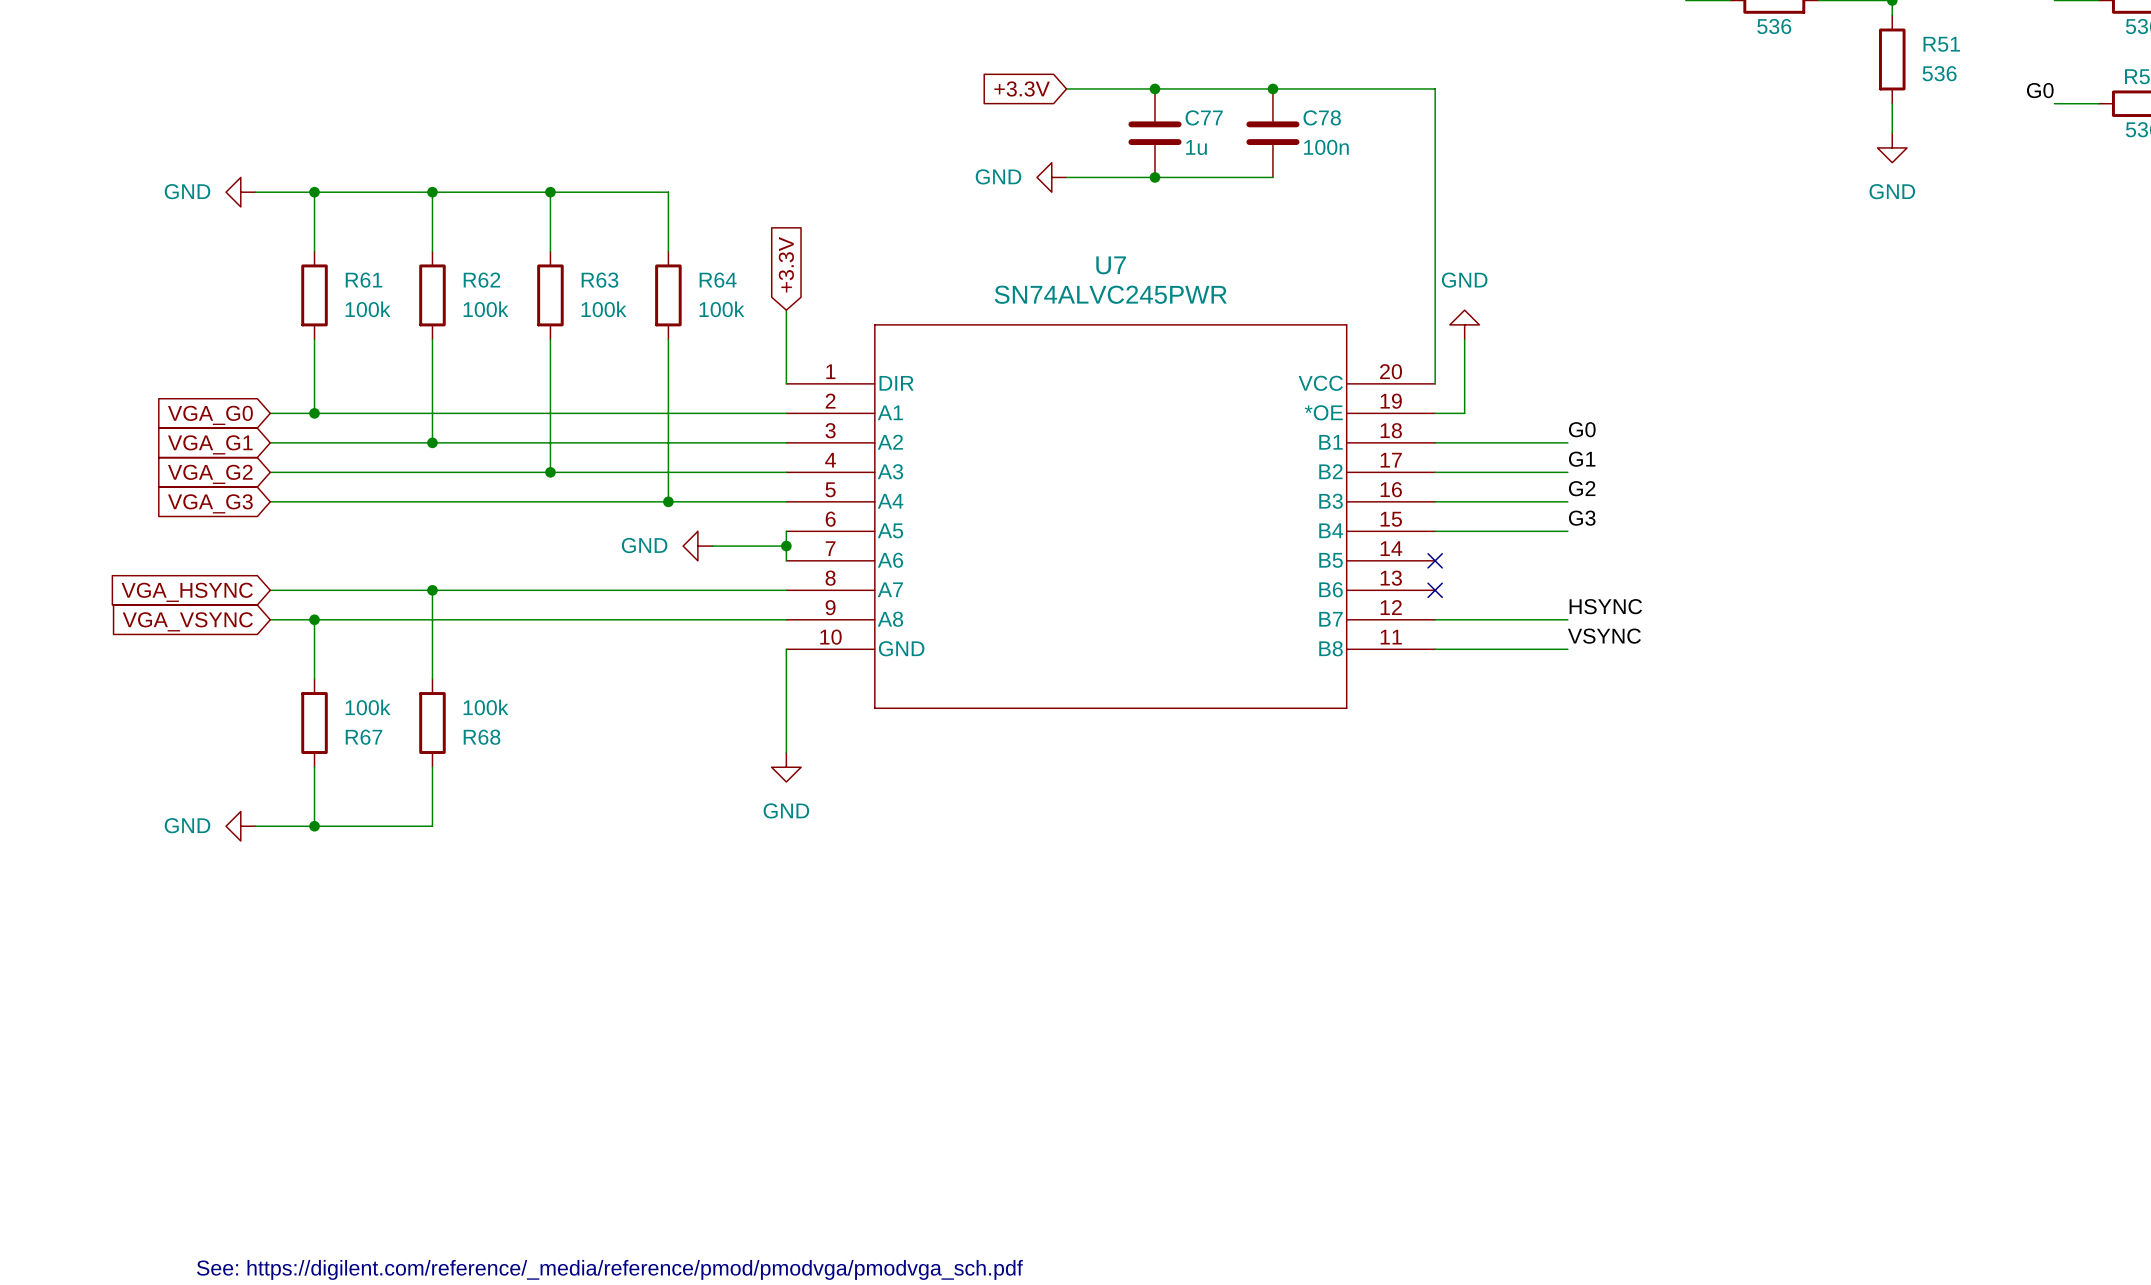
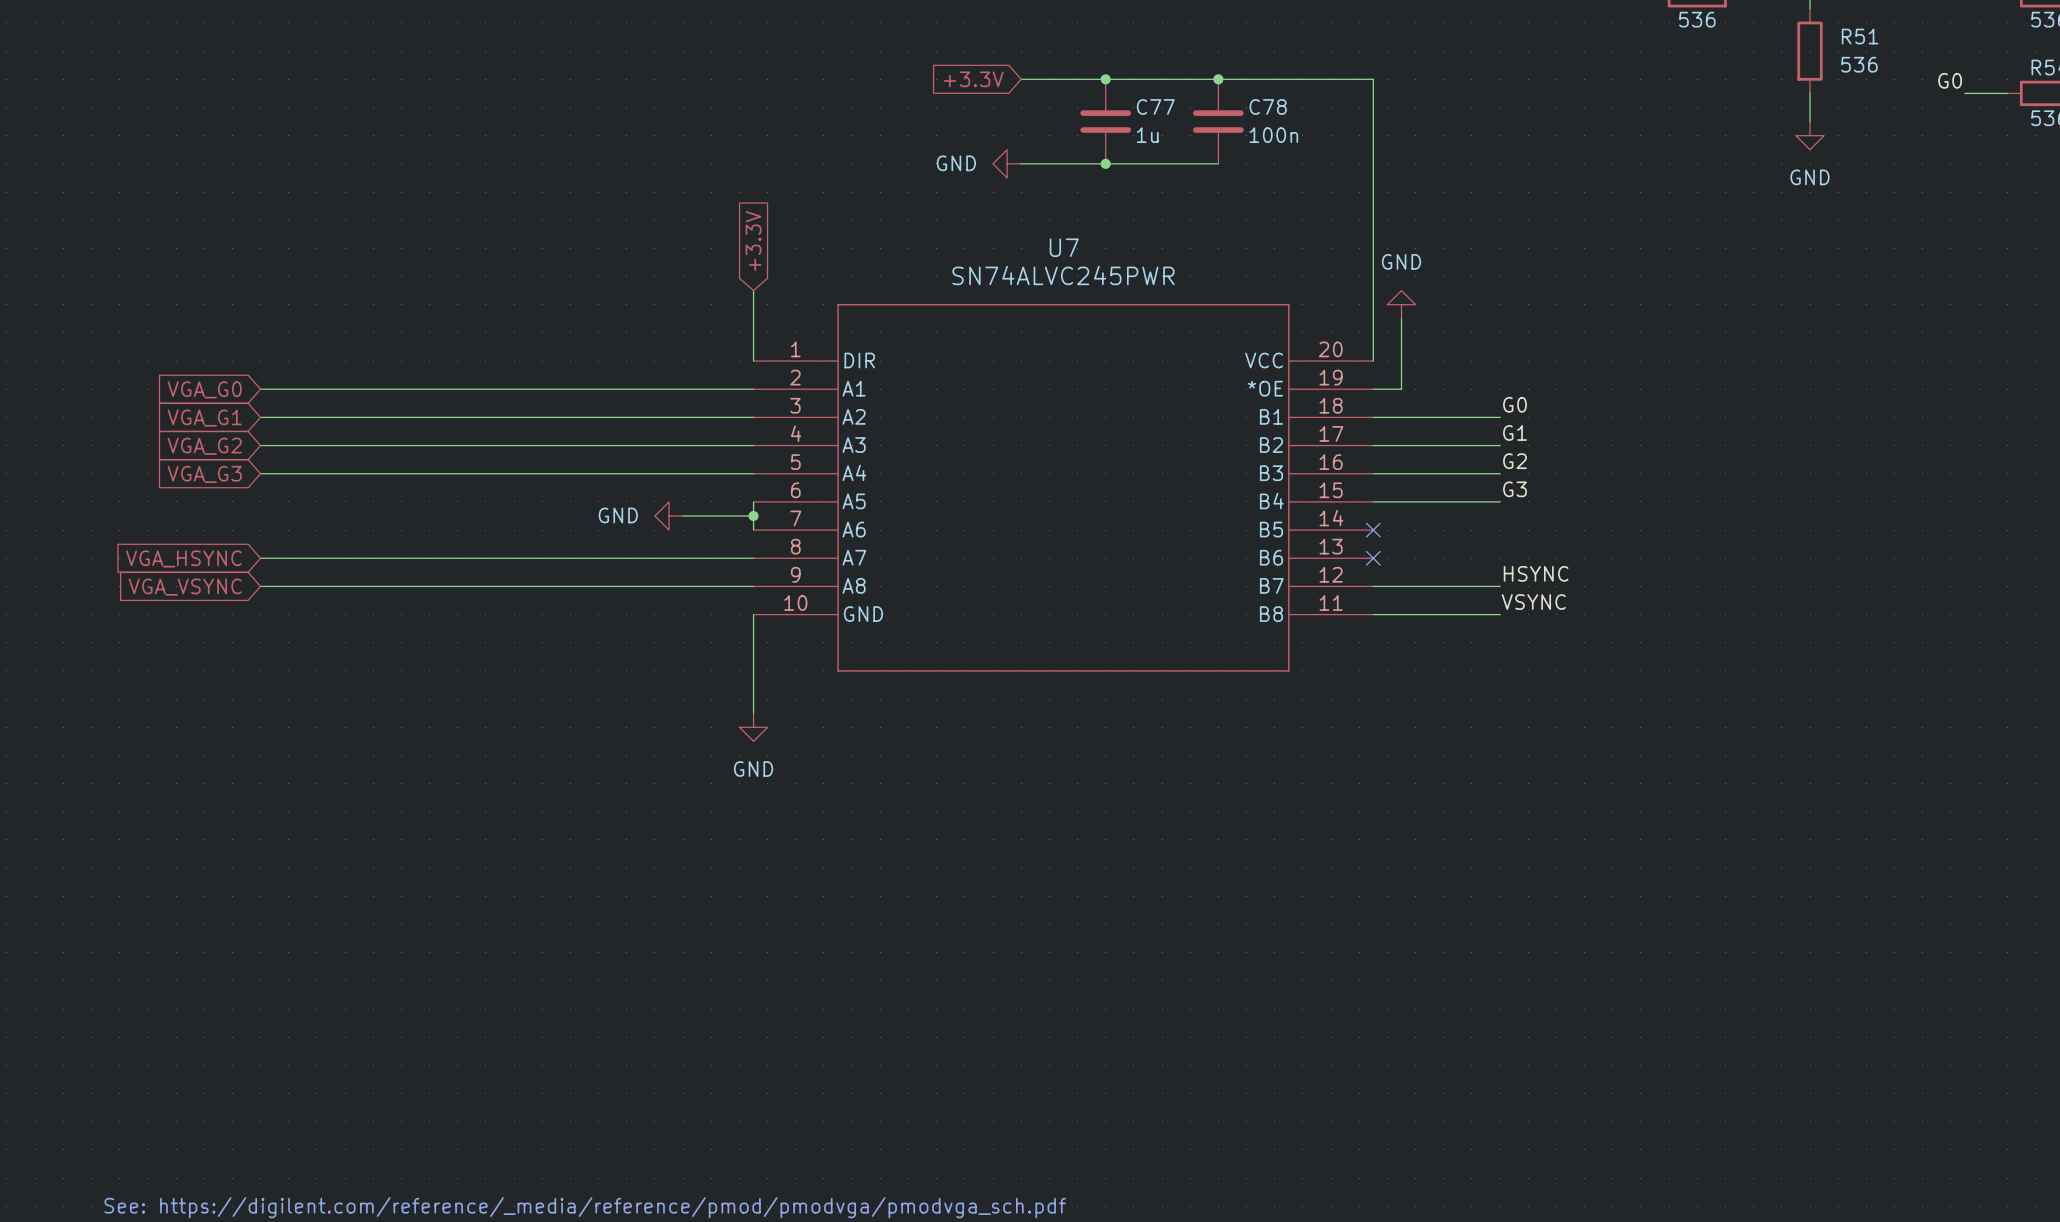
power symbol: GND (240, 192) -> none
wire: (255, 192) (668, 192) (668, 251) -> none
wire: (314, 192) (314, 251) -> none
junction: (314, 192) -> none
wire: (432, 192) (432, 251) -> none
junction: (432, 192) -> none
wire: (550, 192) (550, 251) -> none
junction: (550, 192) -> none
R61: 100k (314, 295) -> none
R62: 100k (432, 295) -> none
R63: 100k (550, 295) -> none
R64: 100k (668, 295) -> none
wire: (314, 339) (314, 413) -> none
wire: (432, 339) (432, 442) -> none
wire: (550, 339) (550, 472) -> none
wire: (668, 339) (668, 501) -> none
junction: (314, 413) -> none
junction: (432, 442) -> none
junction: (550, 472) -> none
junction: (668, 501) -> none
wire: (432, 590) (432, 678) -> none
junction: (432, 590) -> none
wire: (314, 619) (314, 678) -> none
junction: (314, 619) -> none
R67: 100k (314, 723) -> none
R68: 100k (432, 723) -> none
wire: (314, 767) (314, 826) -> none
wire: (432, 767) (432, 826) (255, 826) -> none
power symbol: GND (240, 826) -> none
junction: (314, 826) -> none

